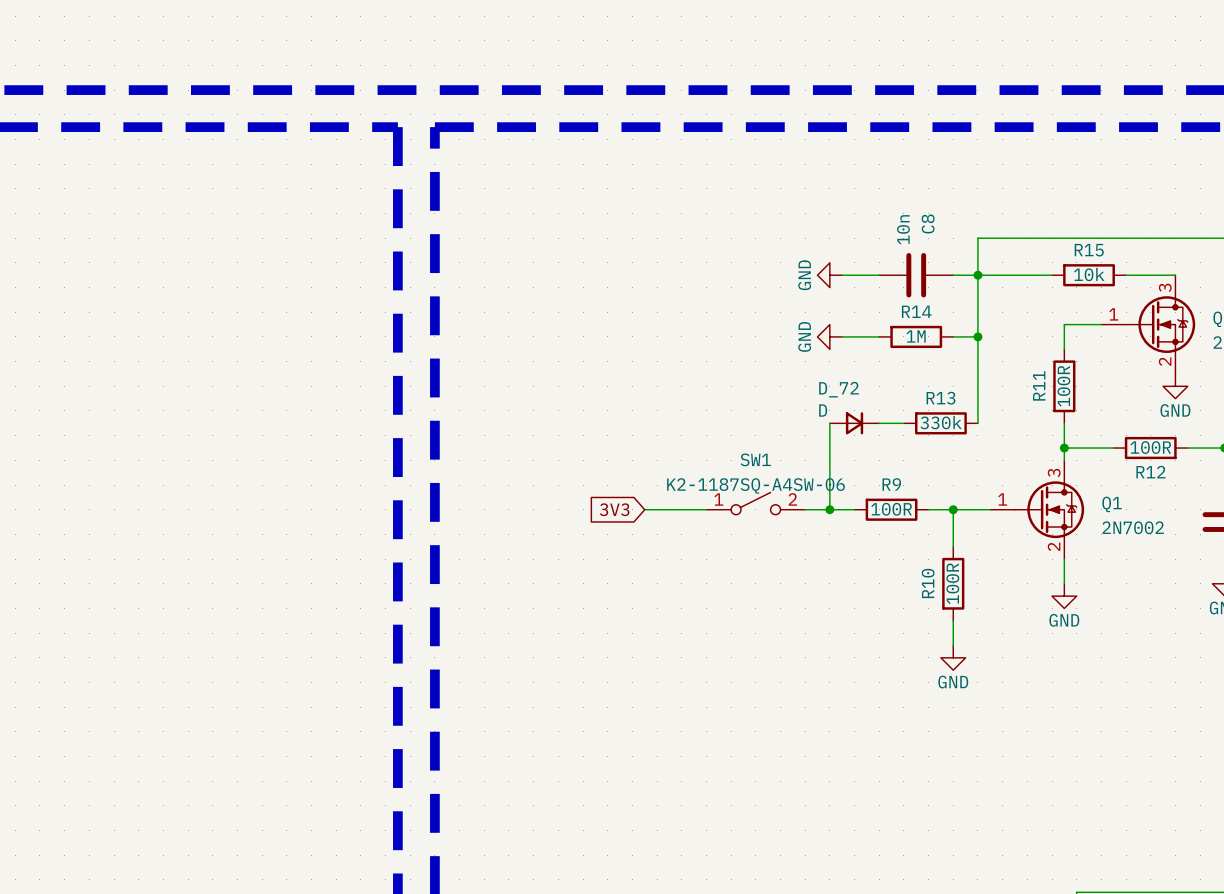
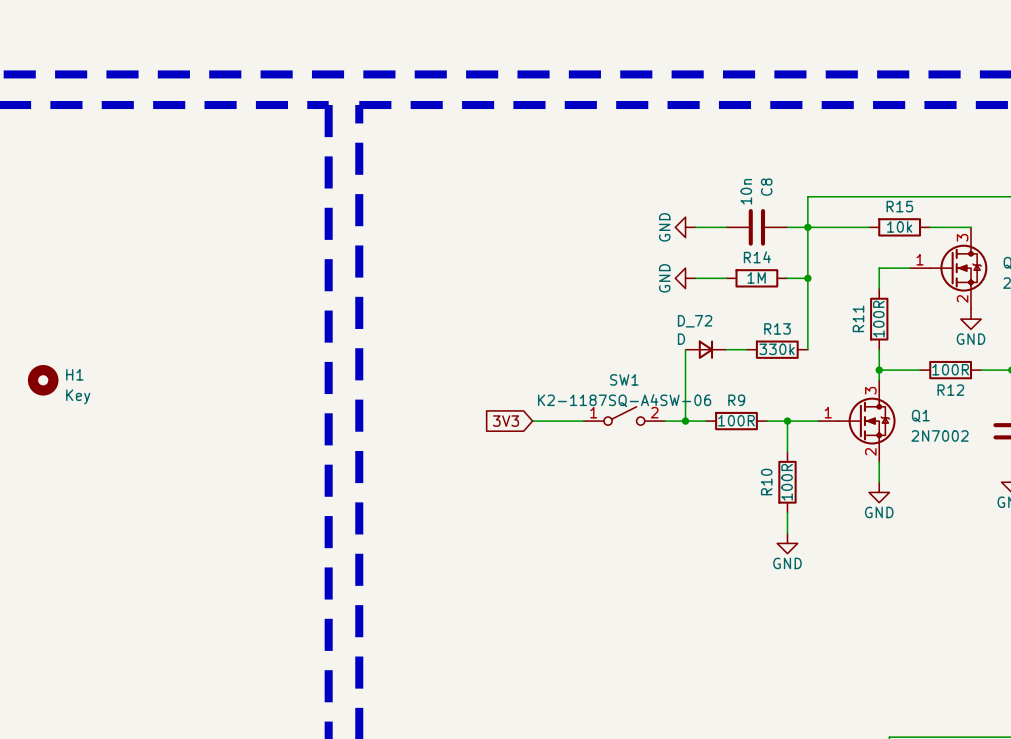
H1: none -> Key (43, 380)

